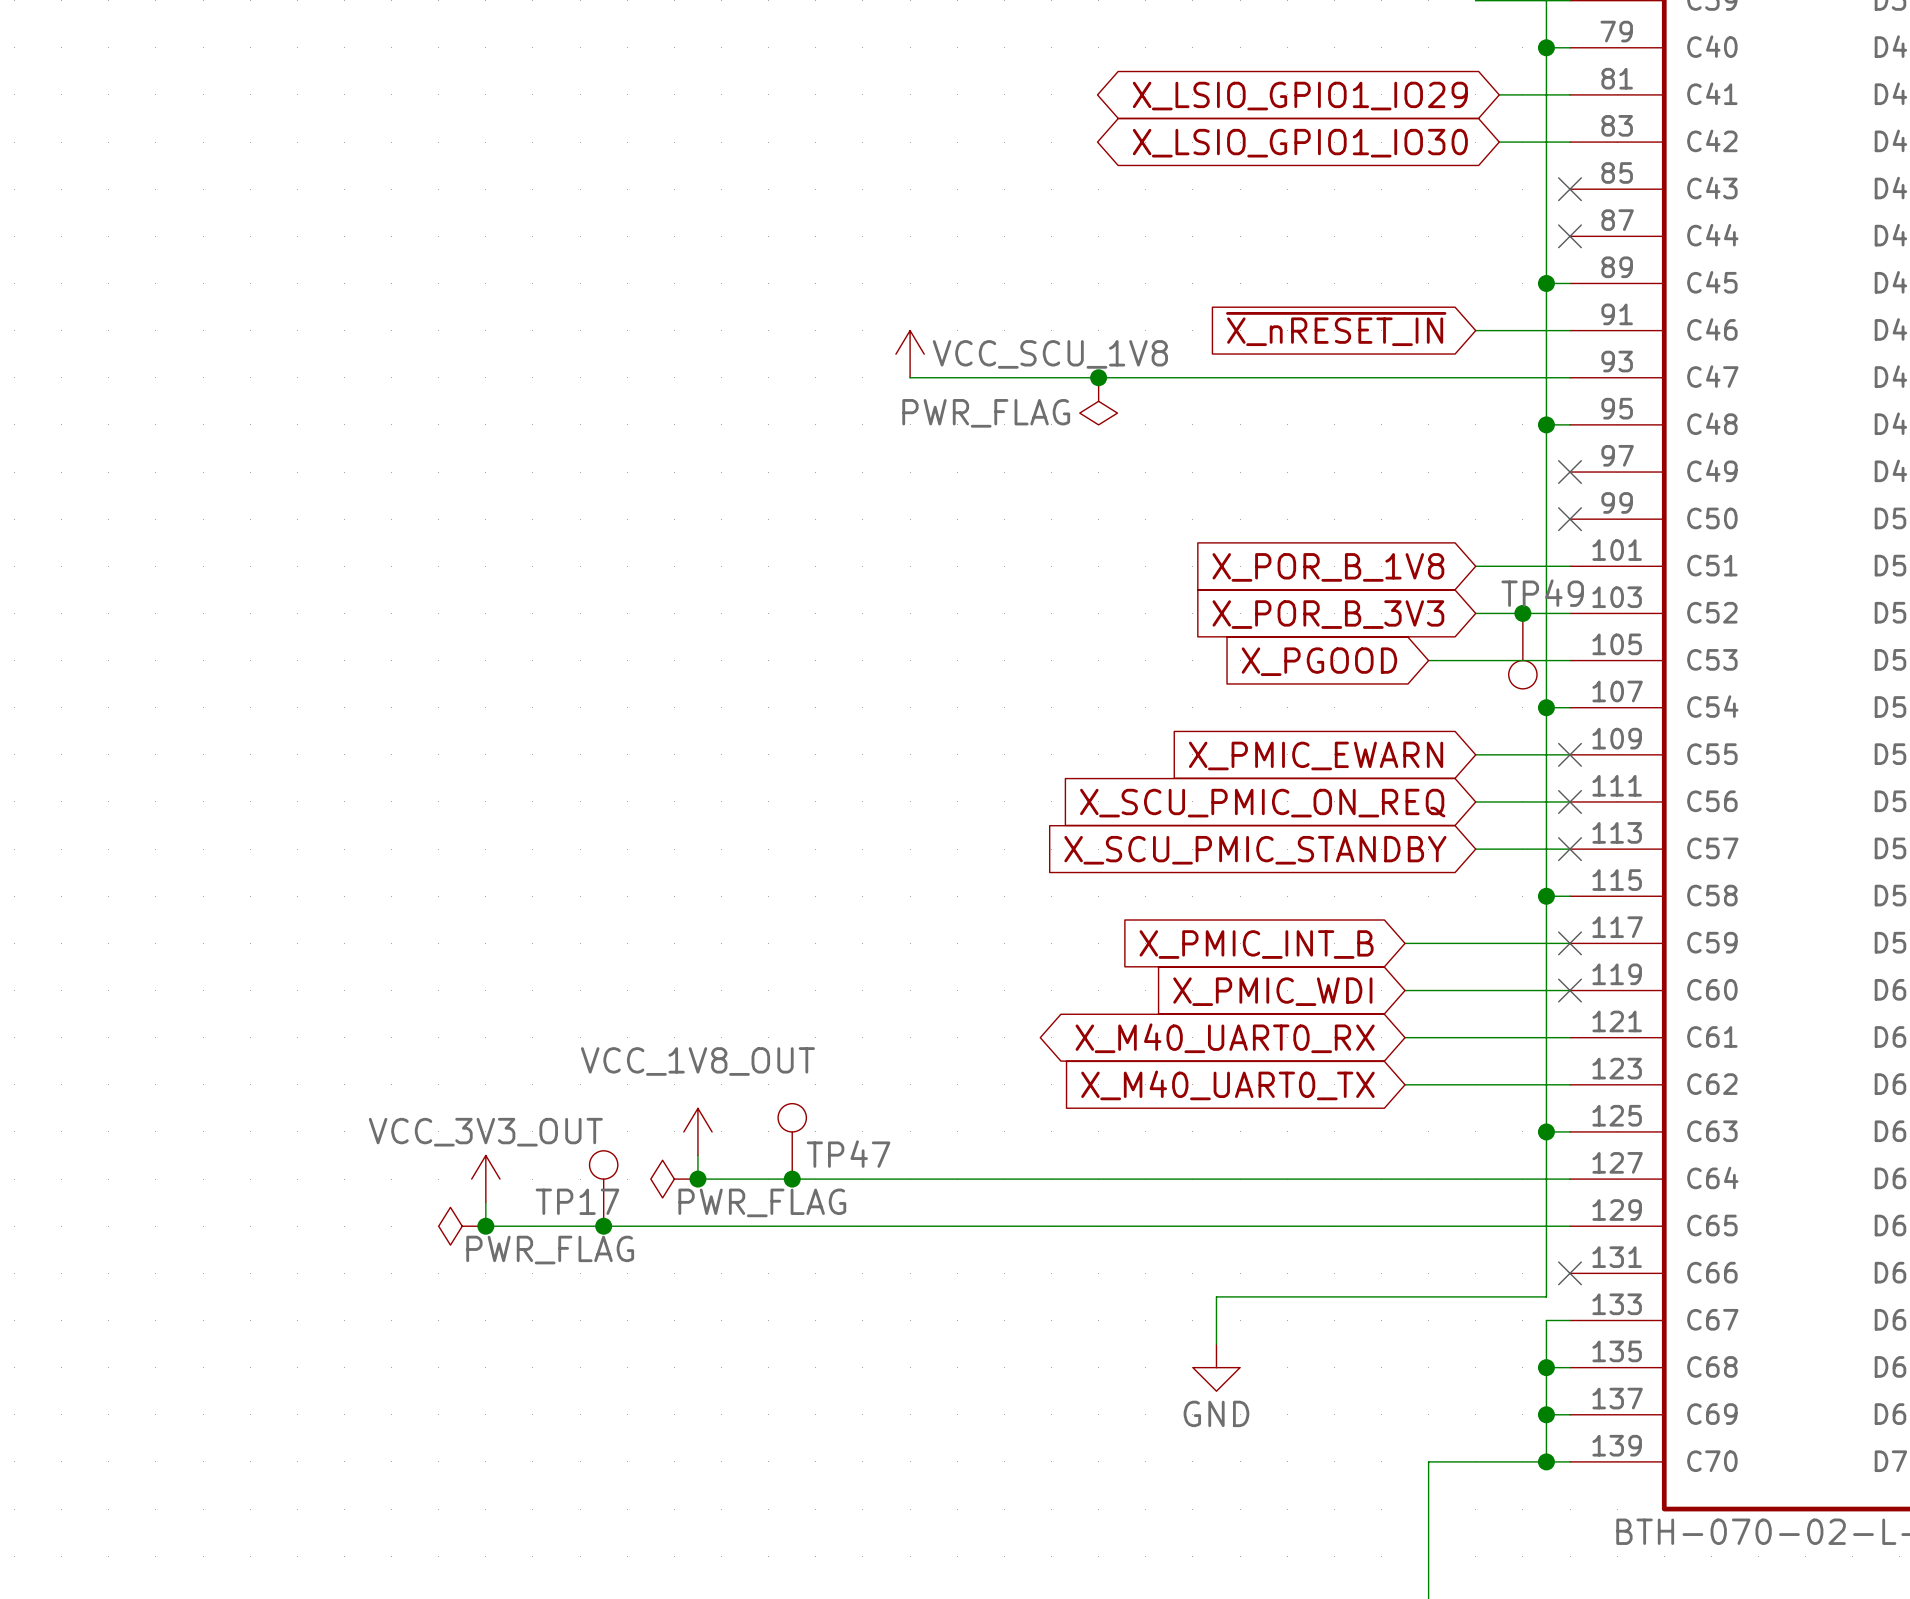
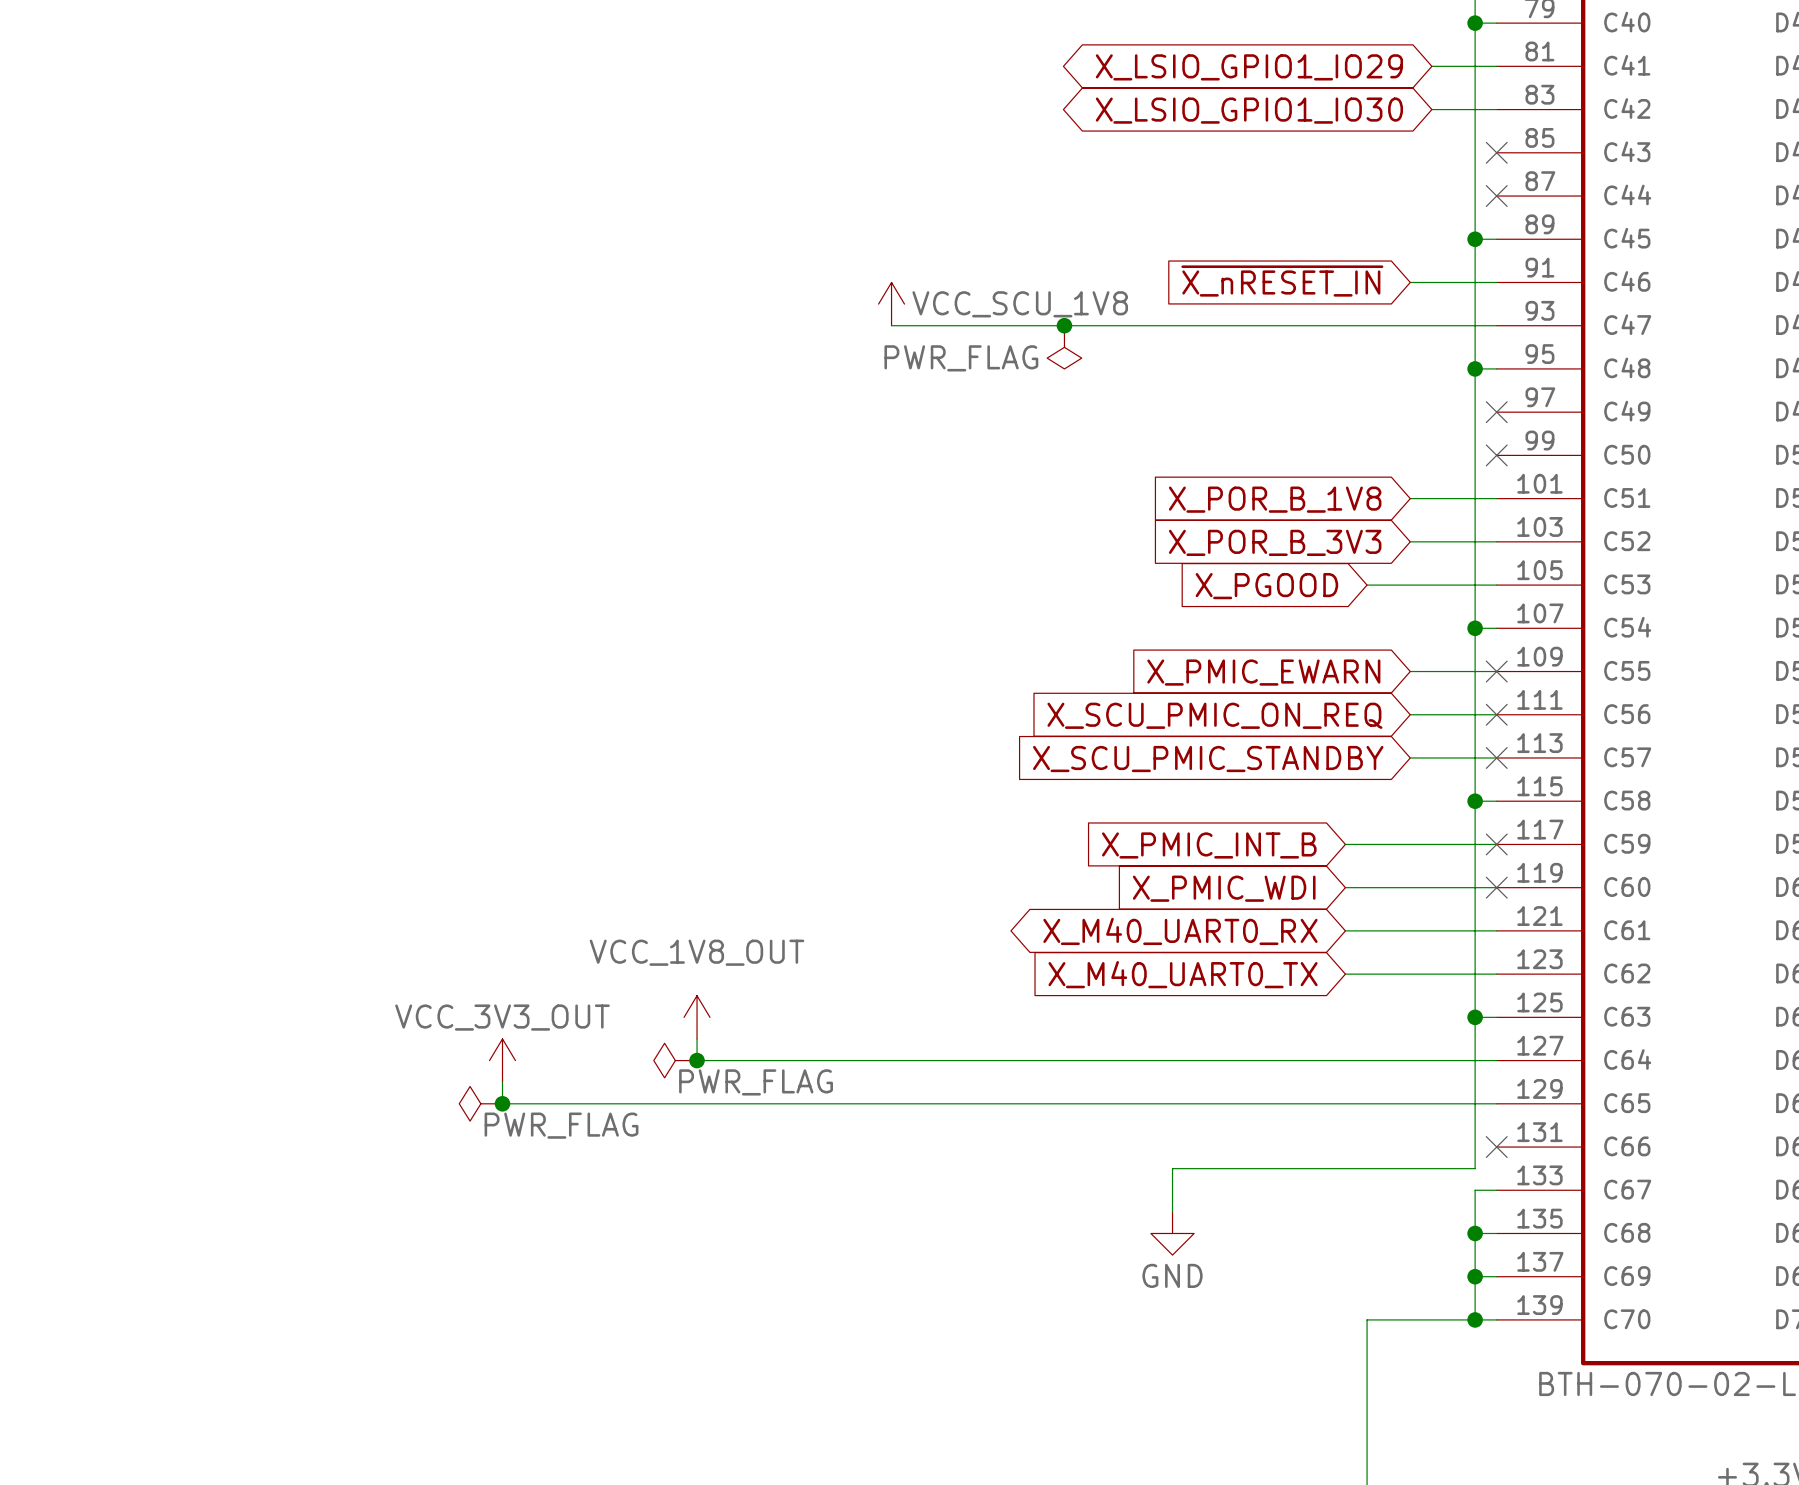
junction: (1522, 613) -> none
TP49: (1522, 651) -> none
TP47: (792, 1141) -> none
junction: (792, 1179) -> none
TP17: (603, 1188) -> none
junction: (603, 1226) -> none

